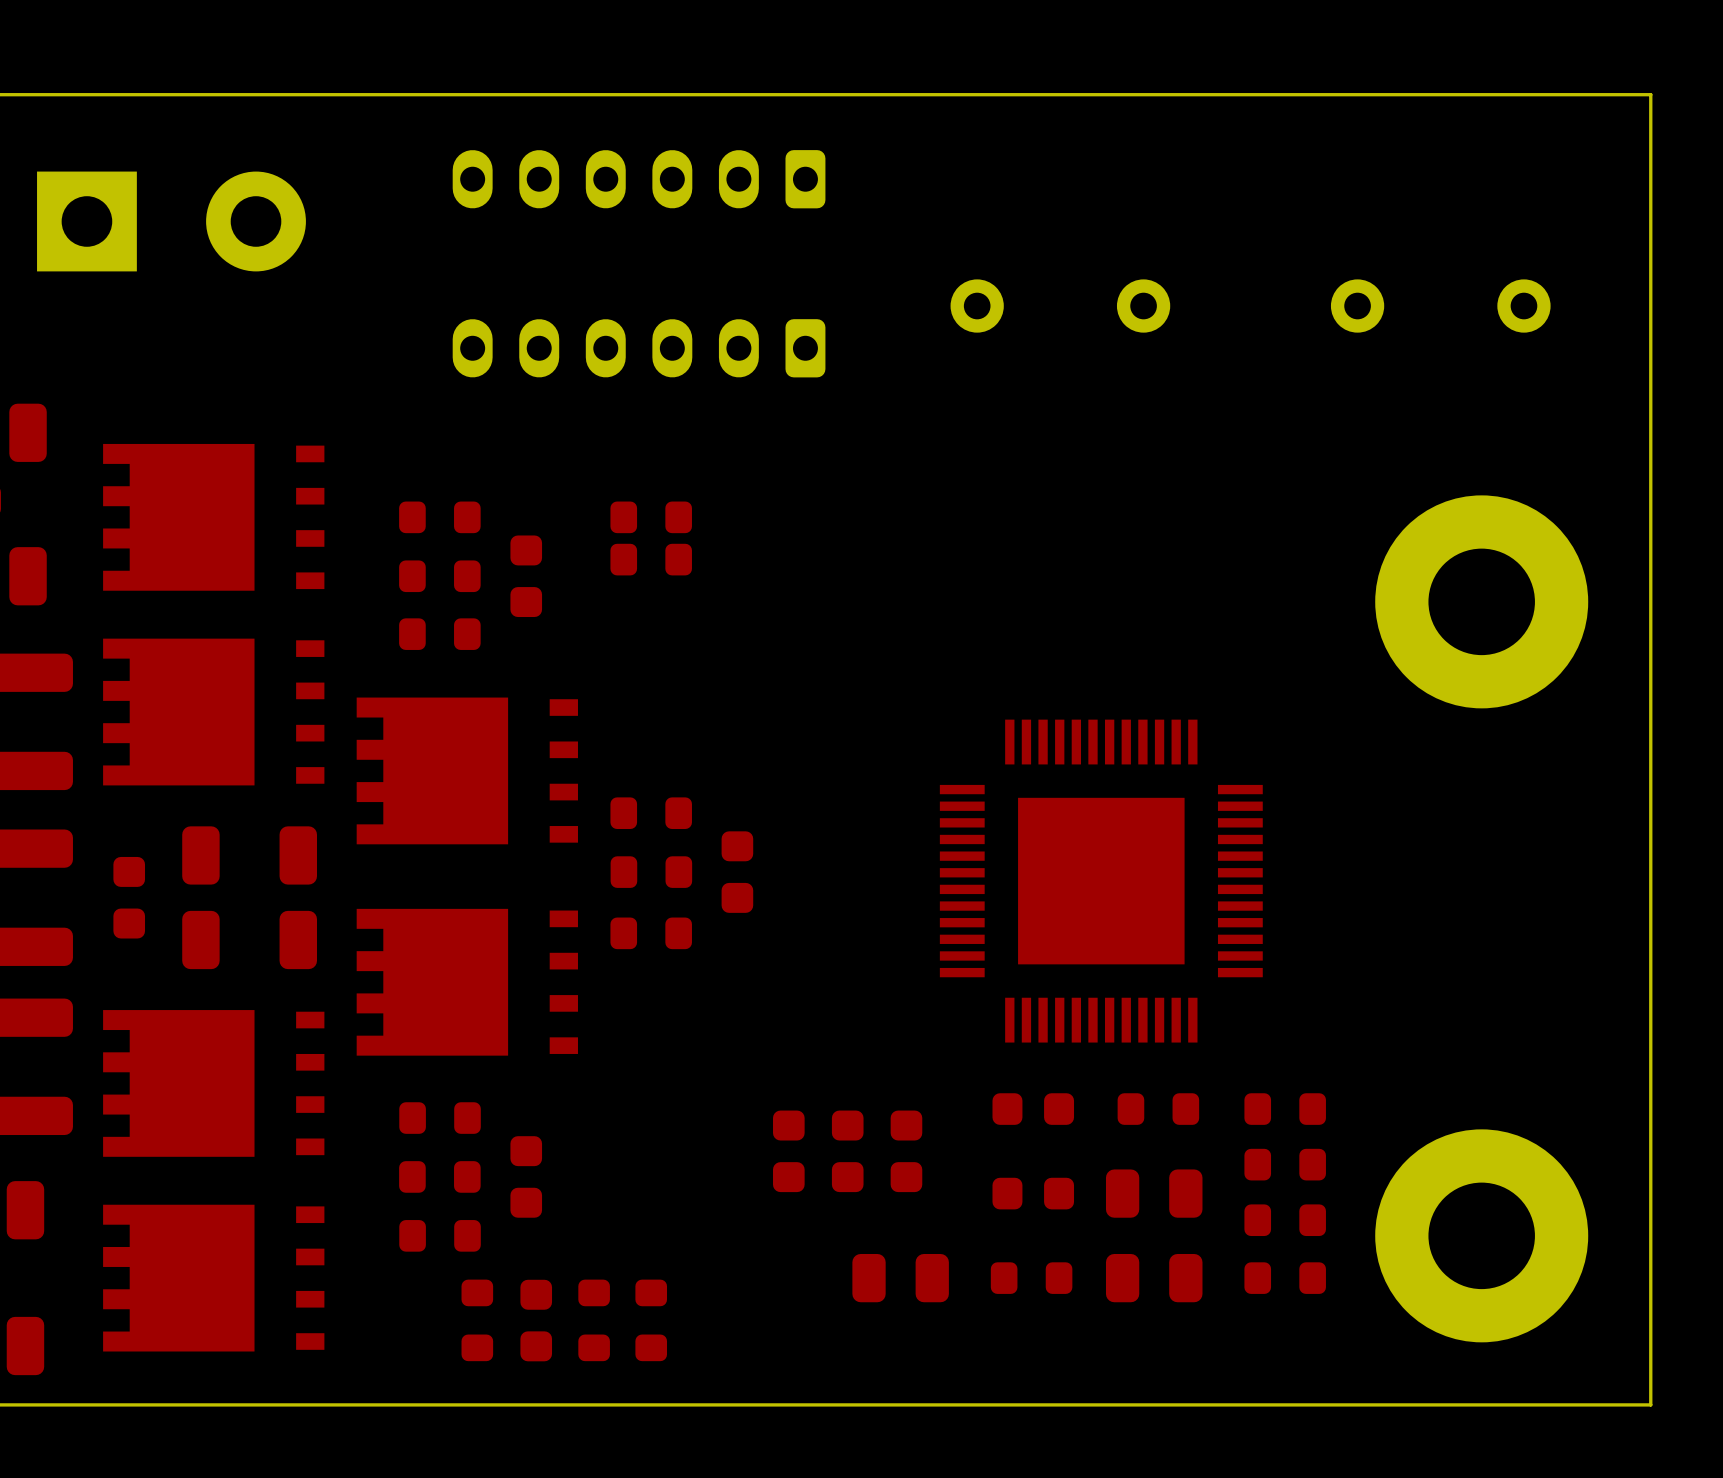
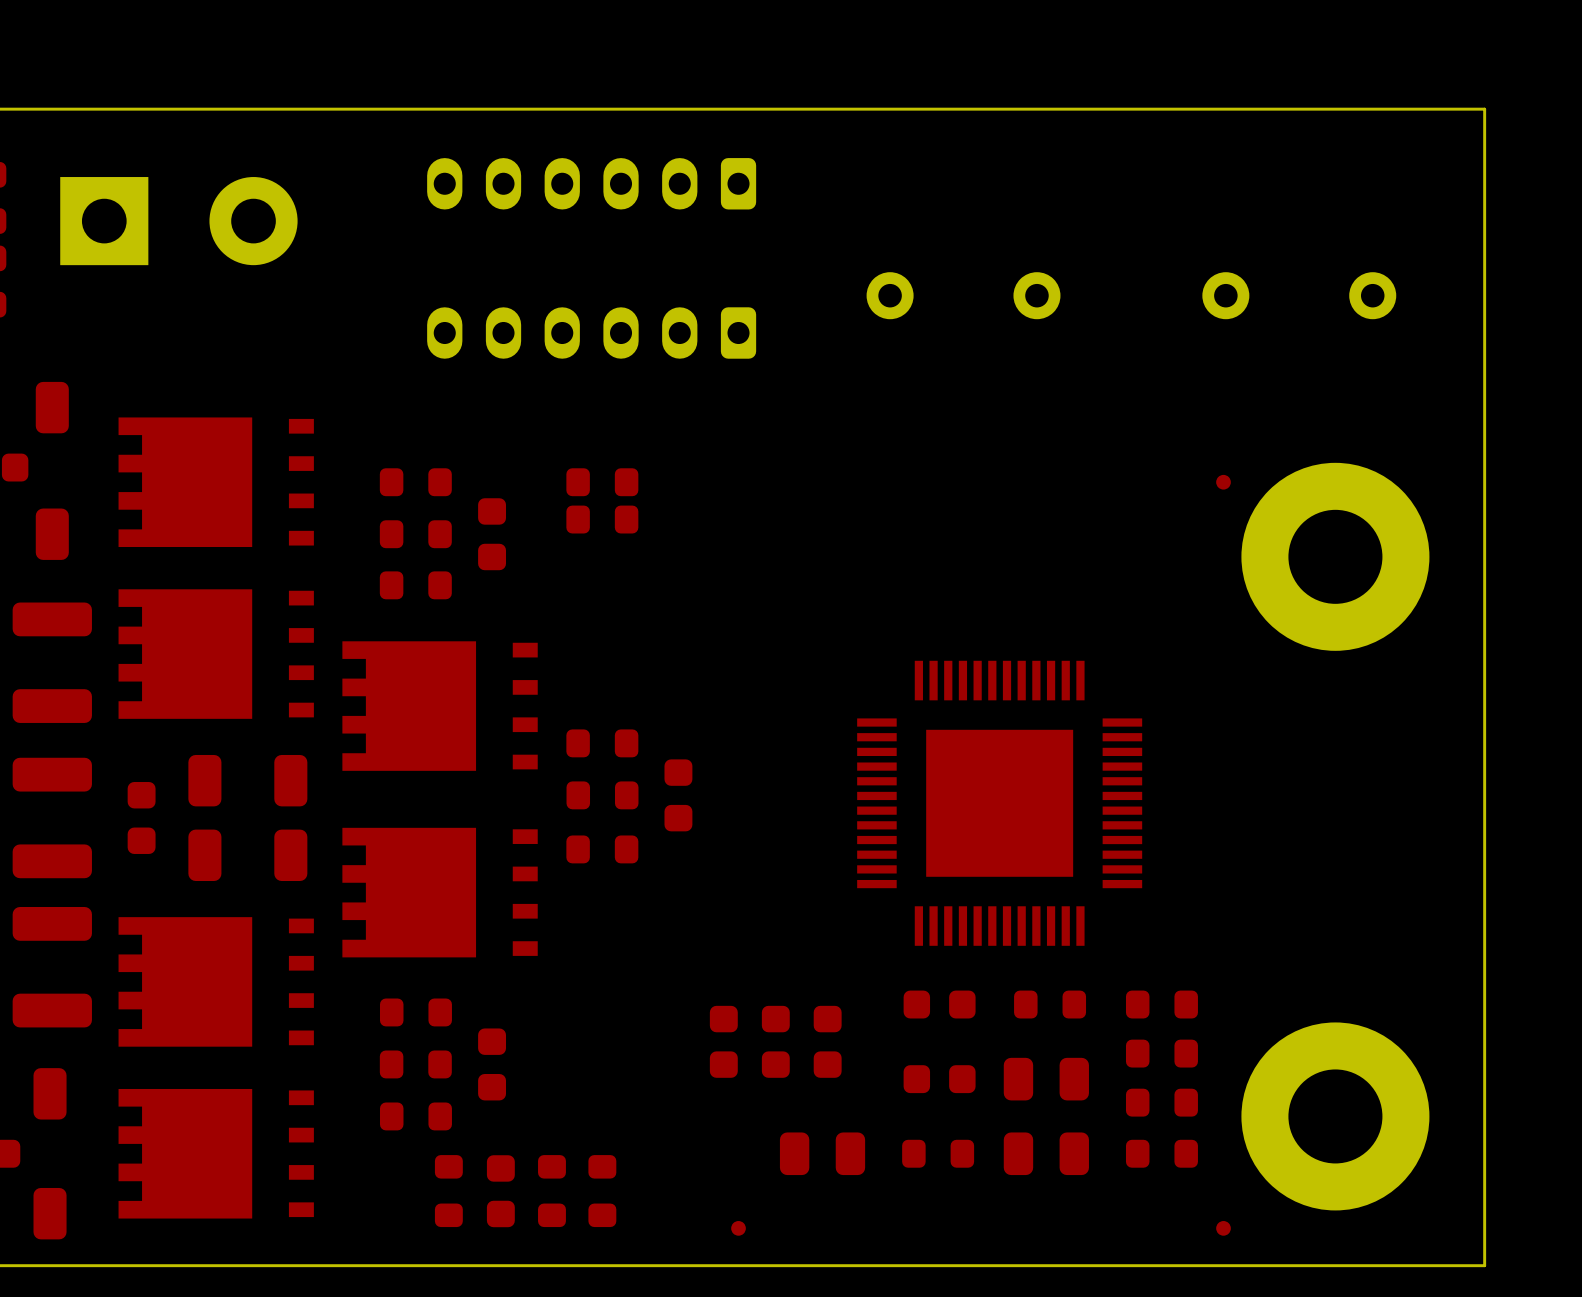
part: none -> (1223, 482)
part: none -> (738, 1228)
part: none -> (1223, 1228)

